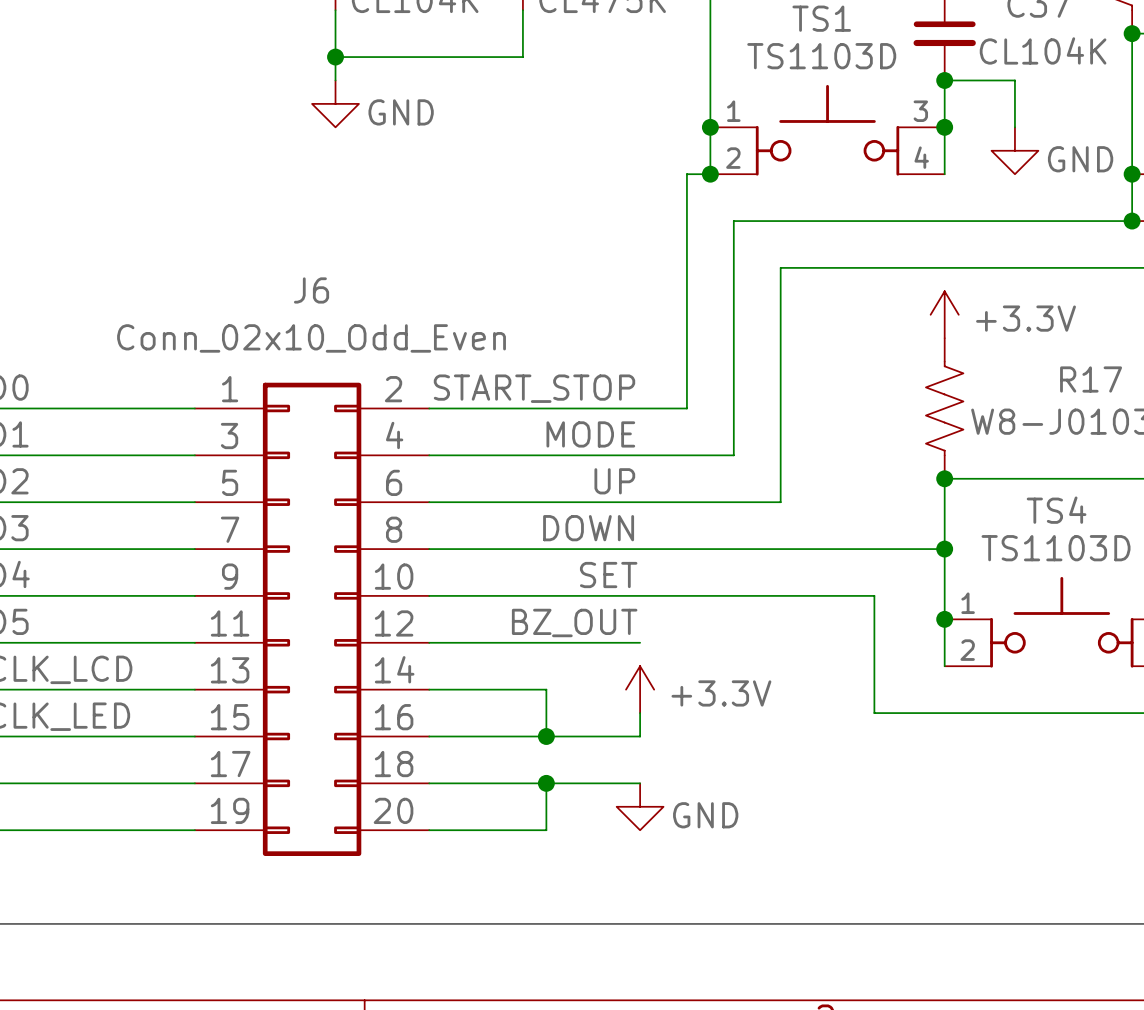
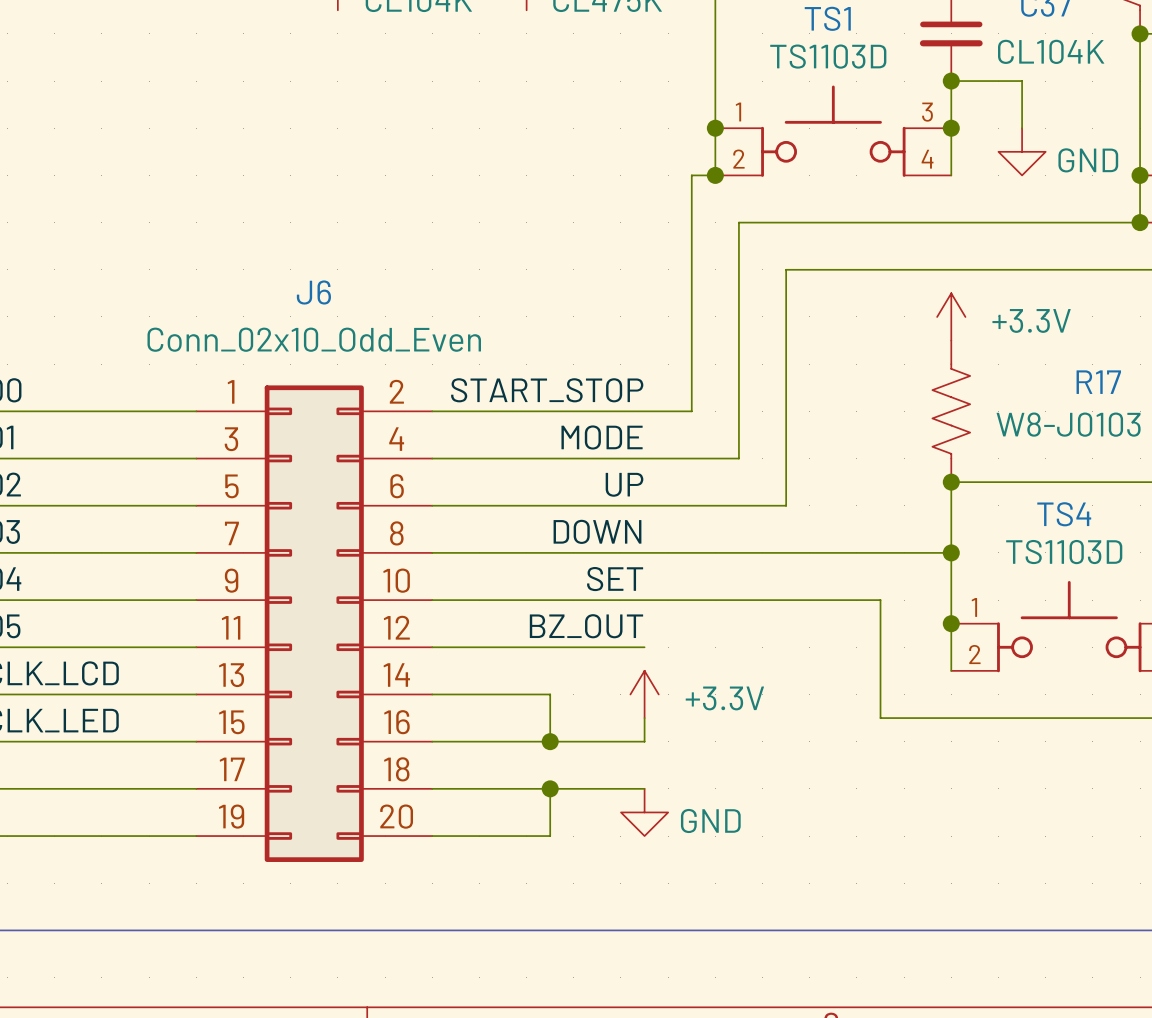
wire: (335, 10) (335, 80) -> none
wire: (522, 10) (522, 57) (335, 57) -> none
junction: (335, 57) -> none
power symbol: GND (335, 103) -> none

